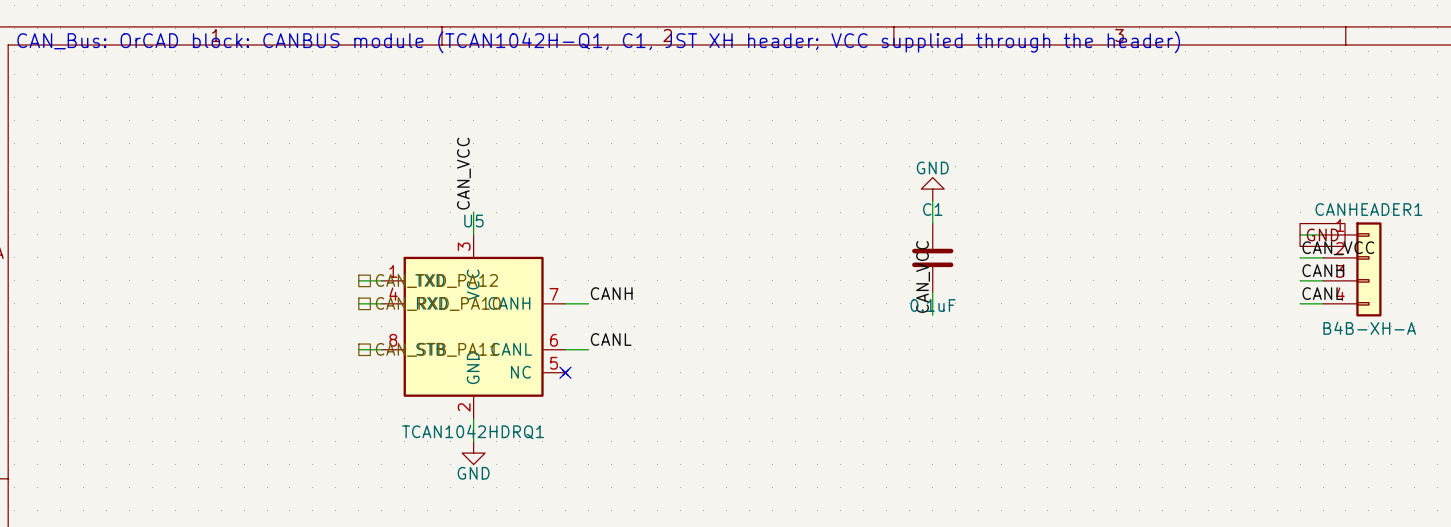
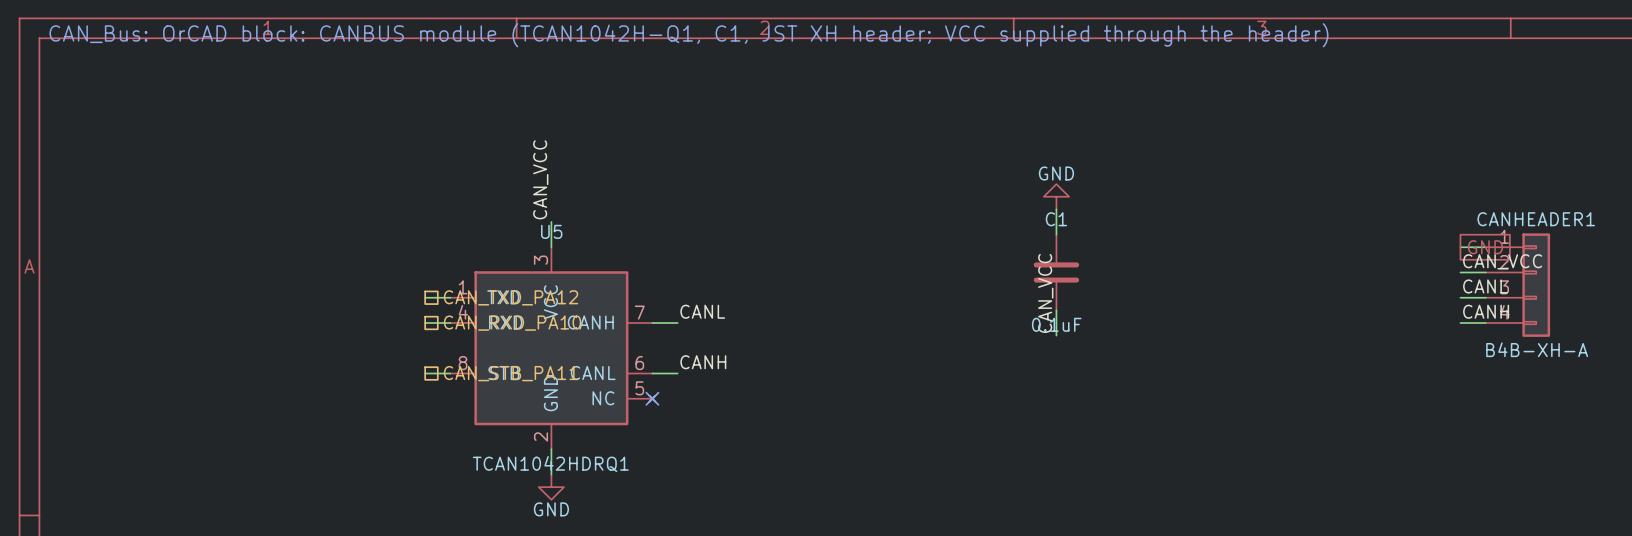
label: CANH (1323, 270) -> CANL (1485, 286)
label: CANH (611, 293) -> CANL (702, 311)
label: CANL (1322, 293) -> CANH (1486, 311)
label: CANL (611, 339) -> CANH (703, 362)

